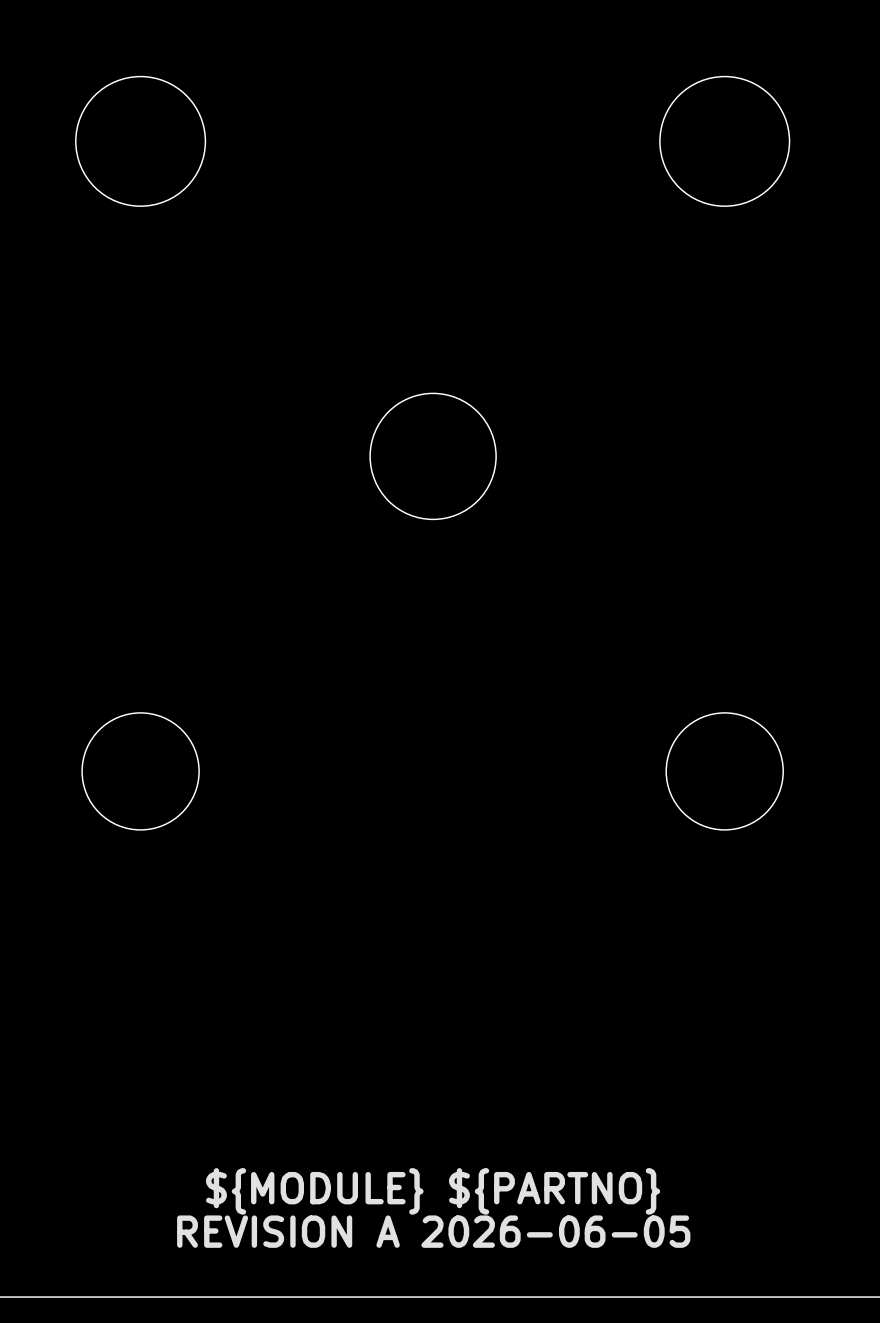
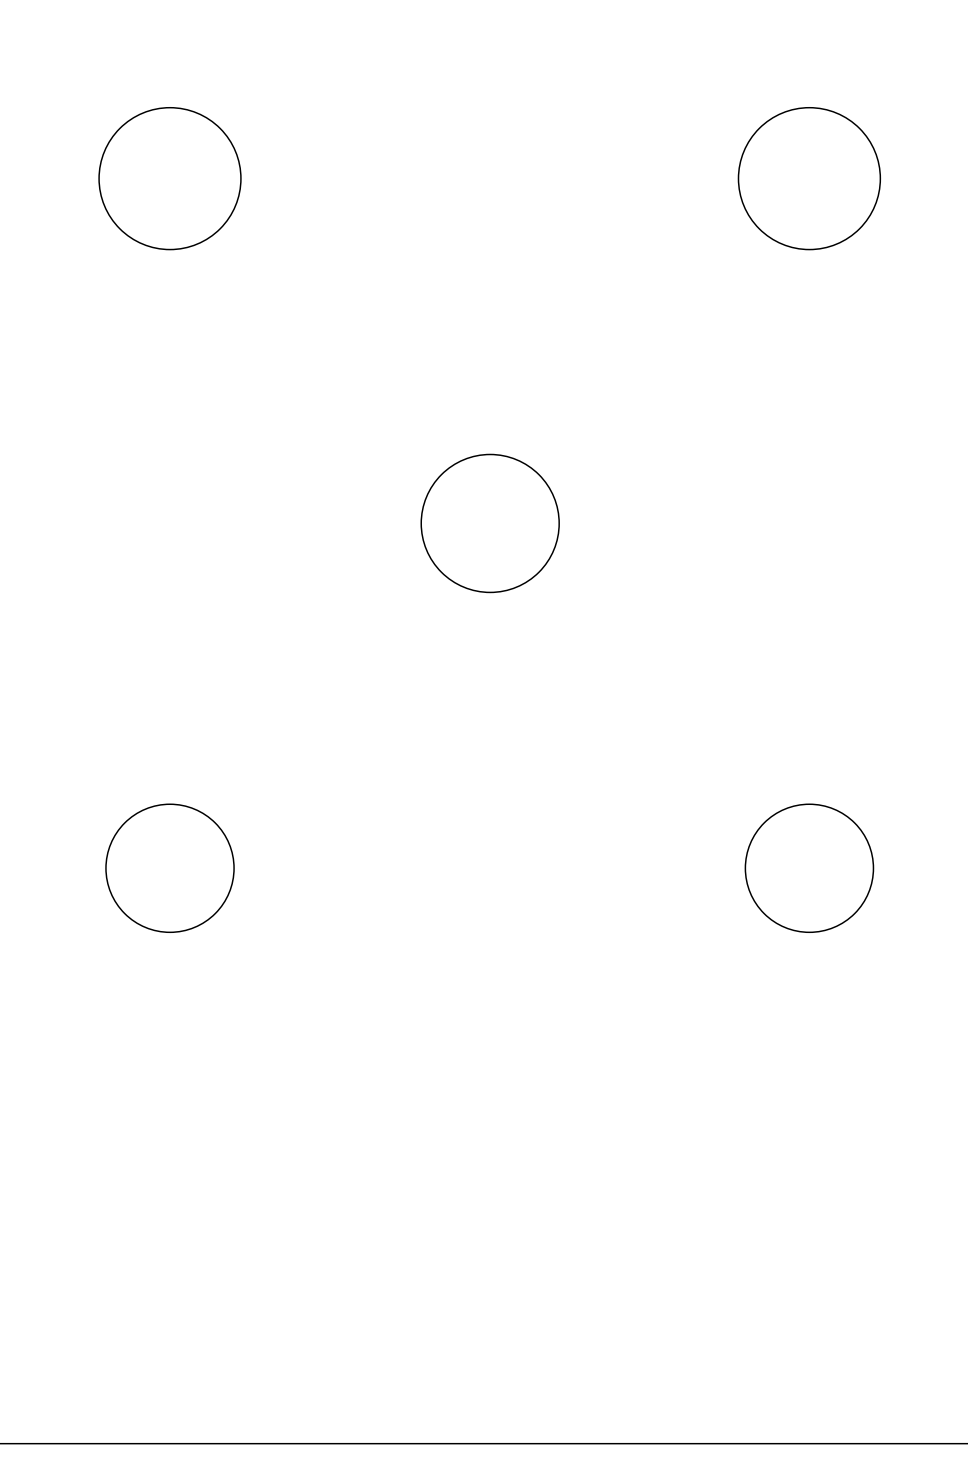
text: ${MODULE} ${PARTNO} (433, 1191) -> none
text: REVISION A 2026-06-05 (433, 1231) -> none

